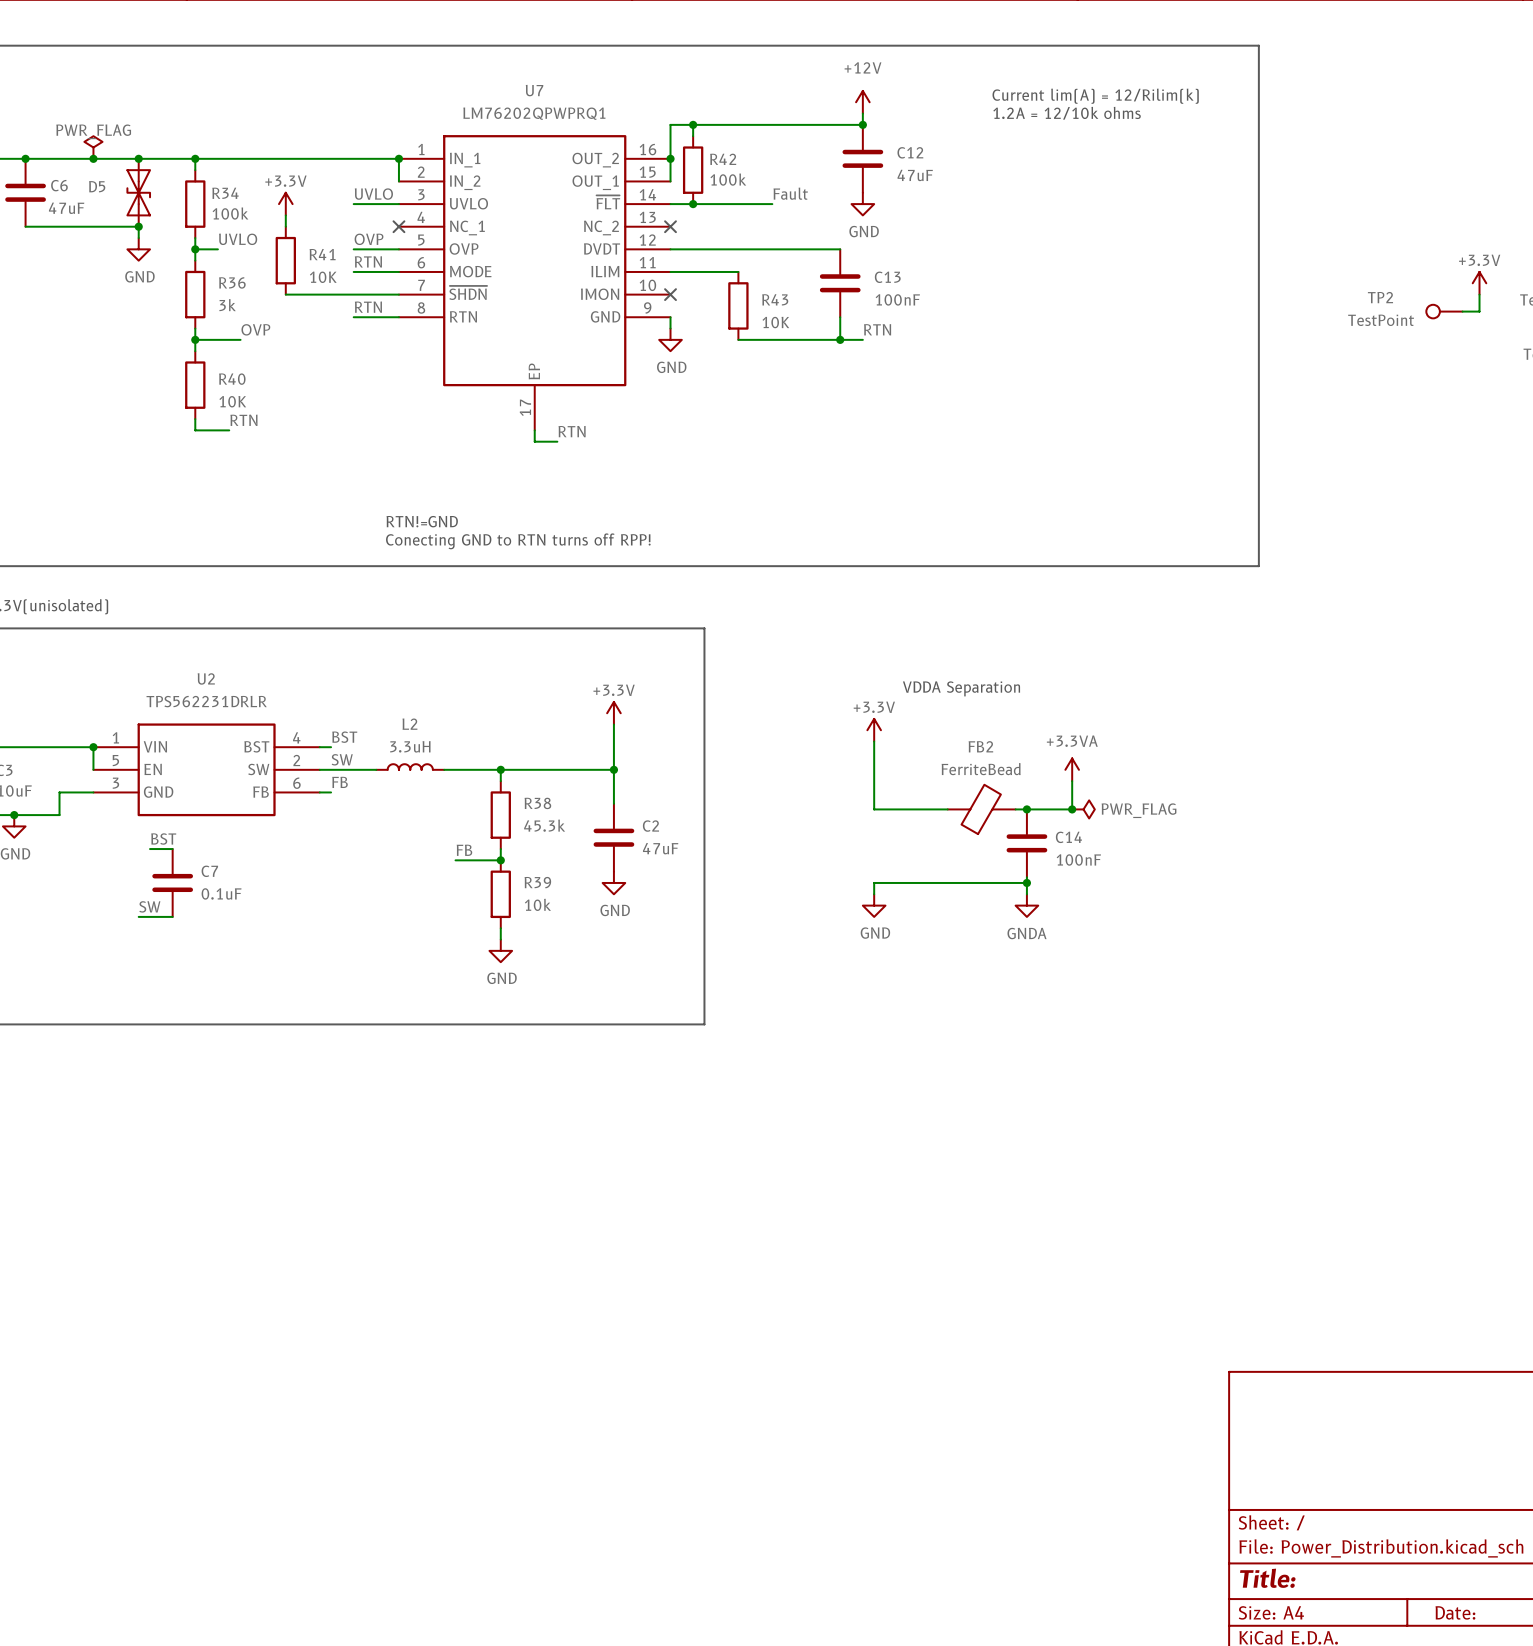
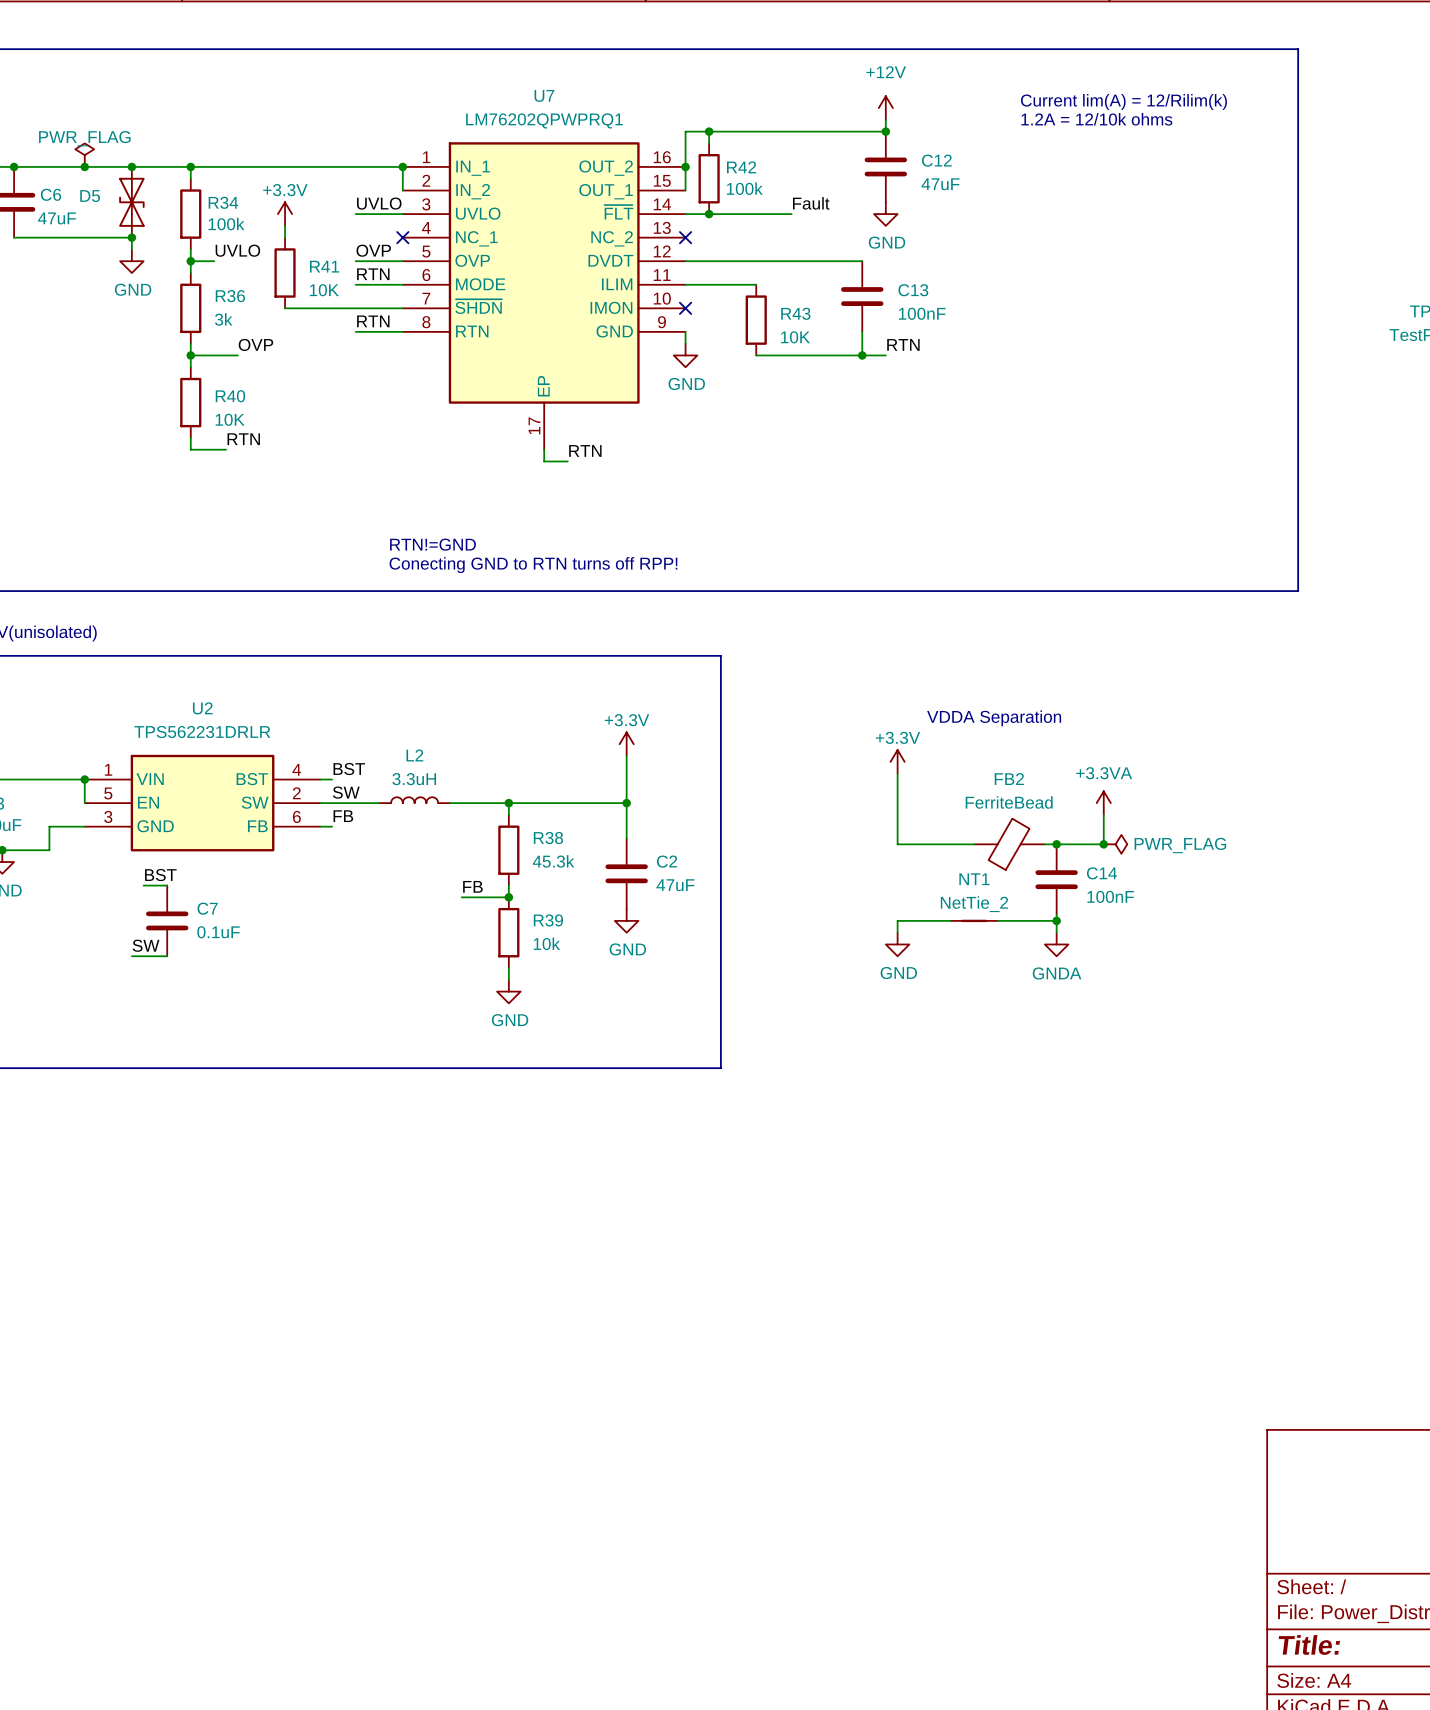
NT1: none -> NetTie_2 (974, 920)

